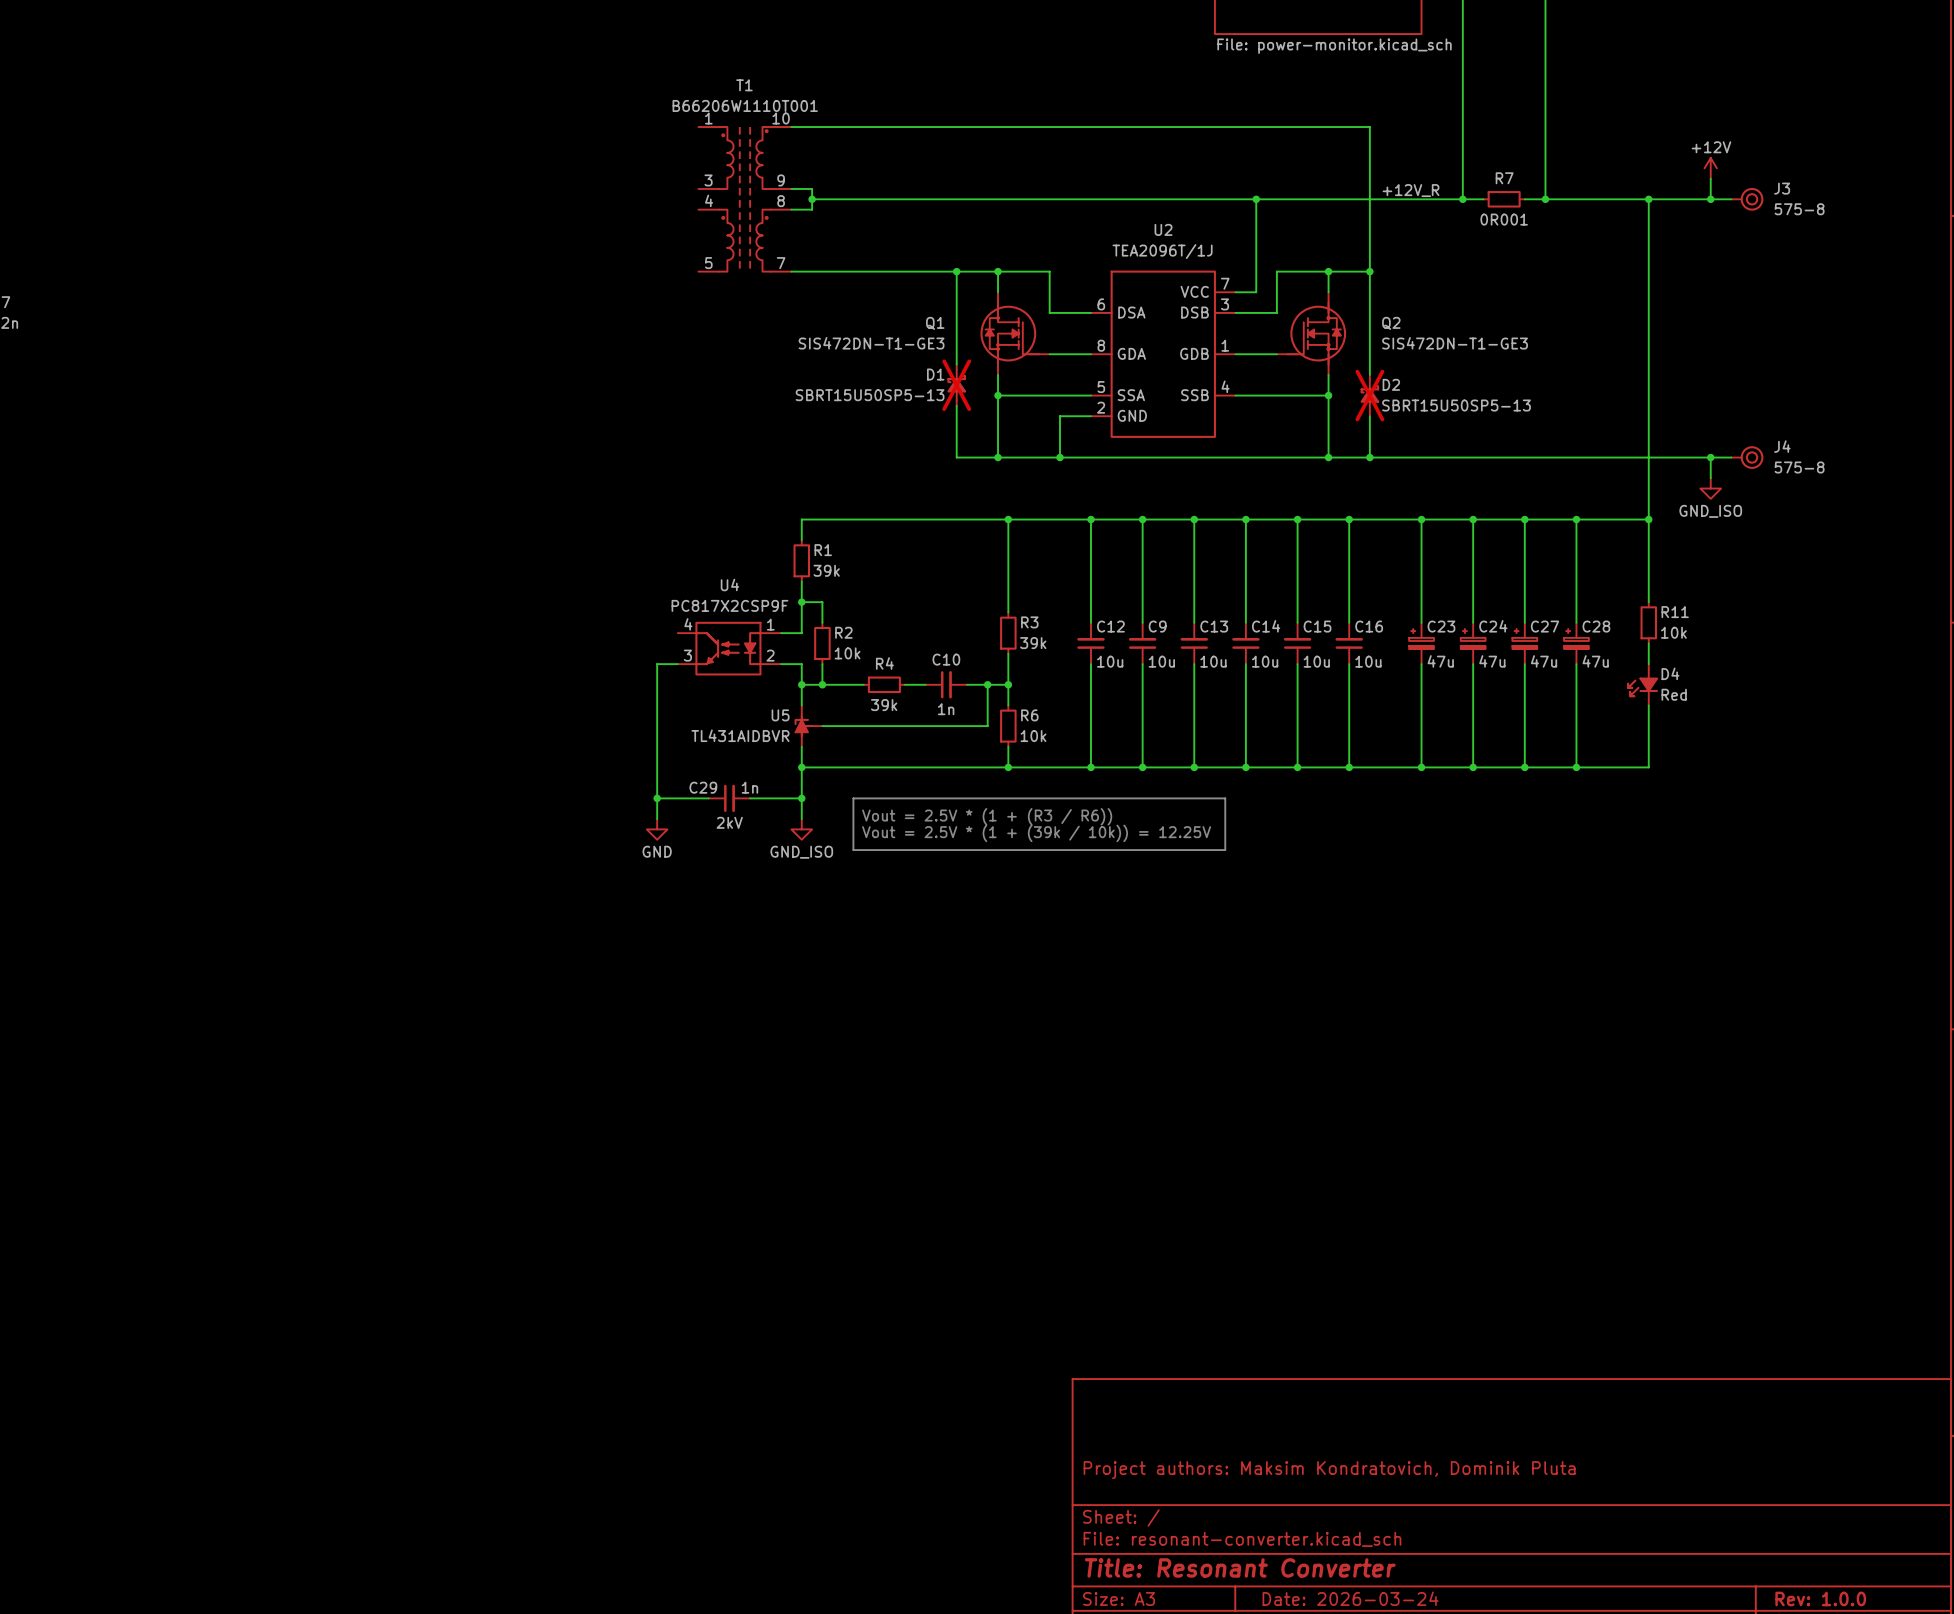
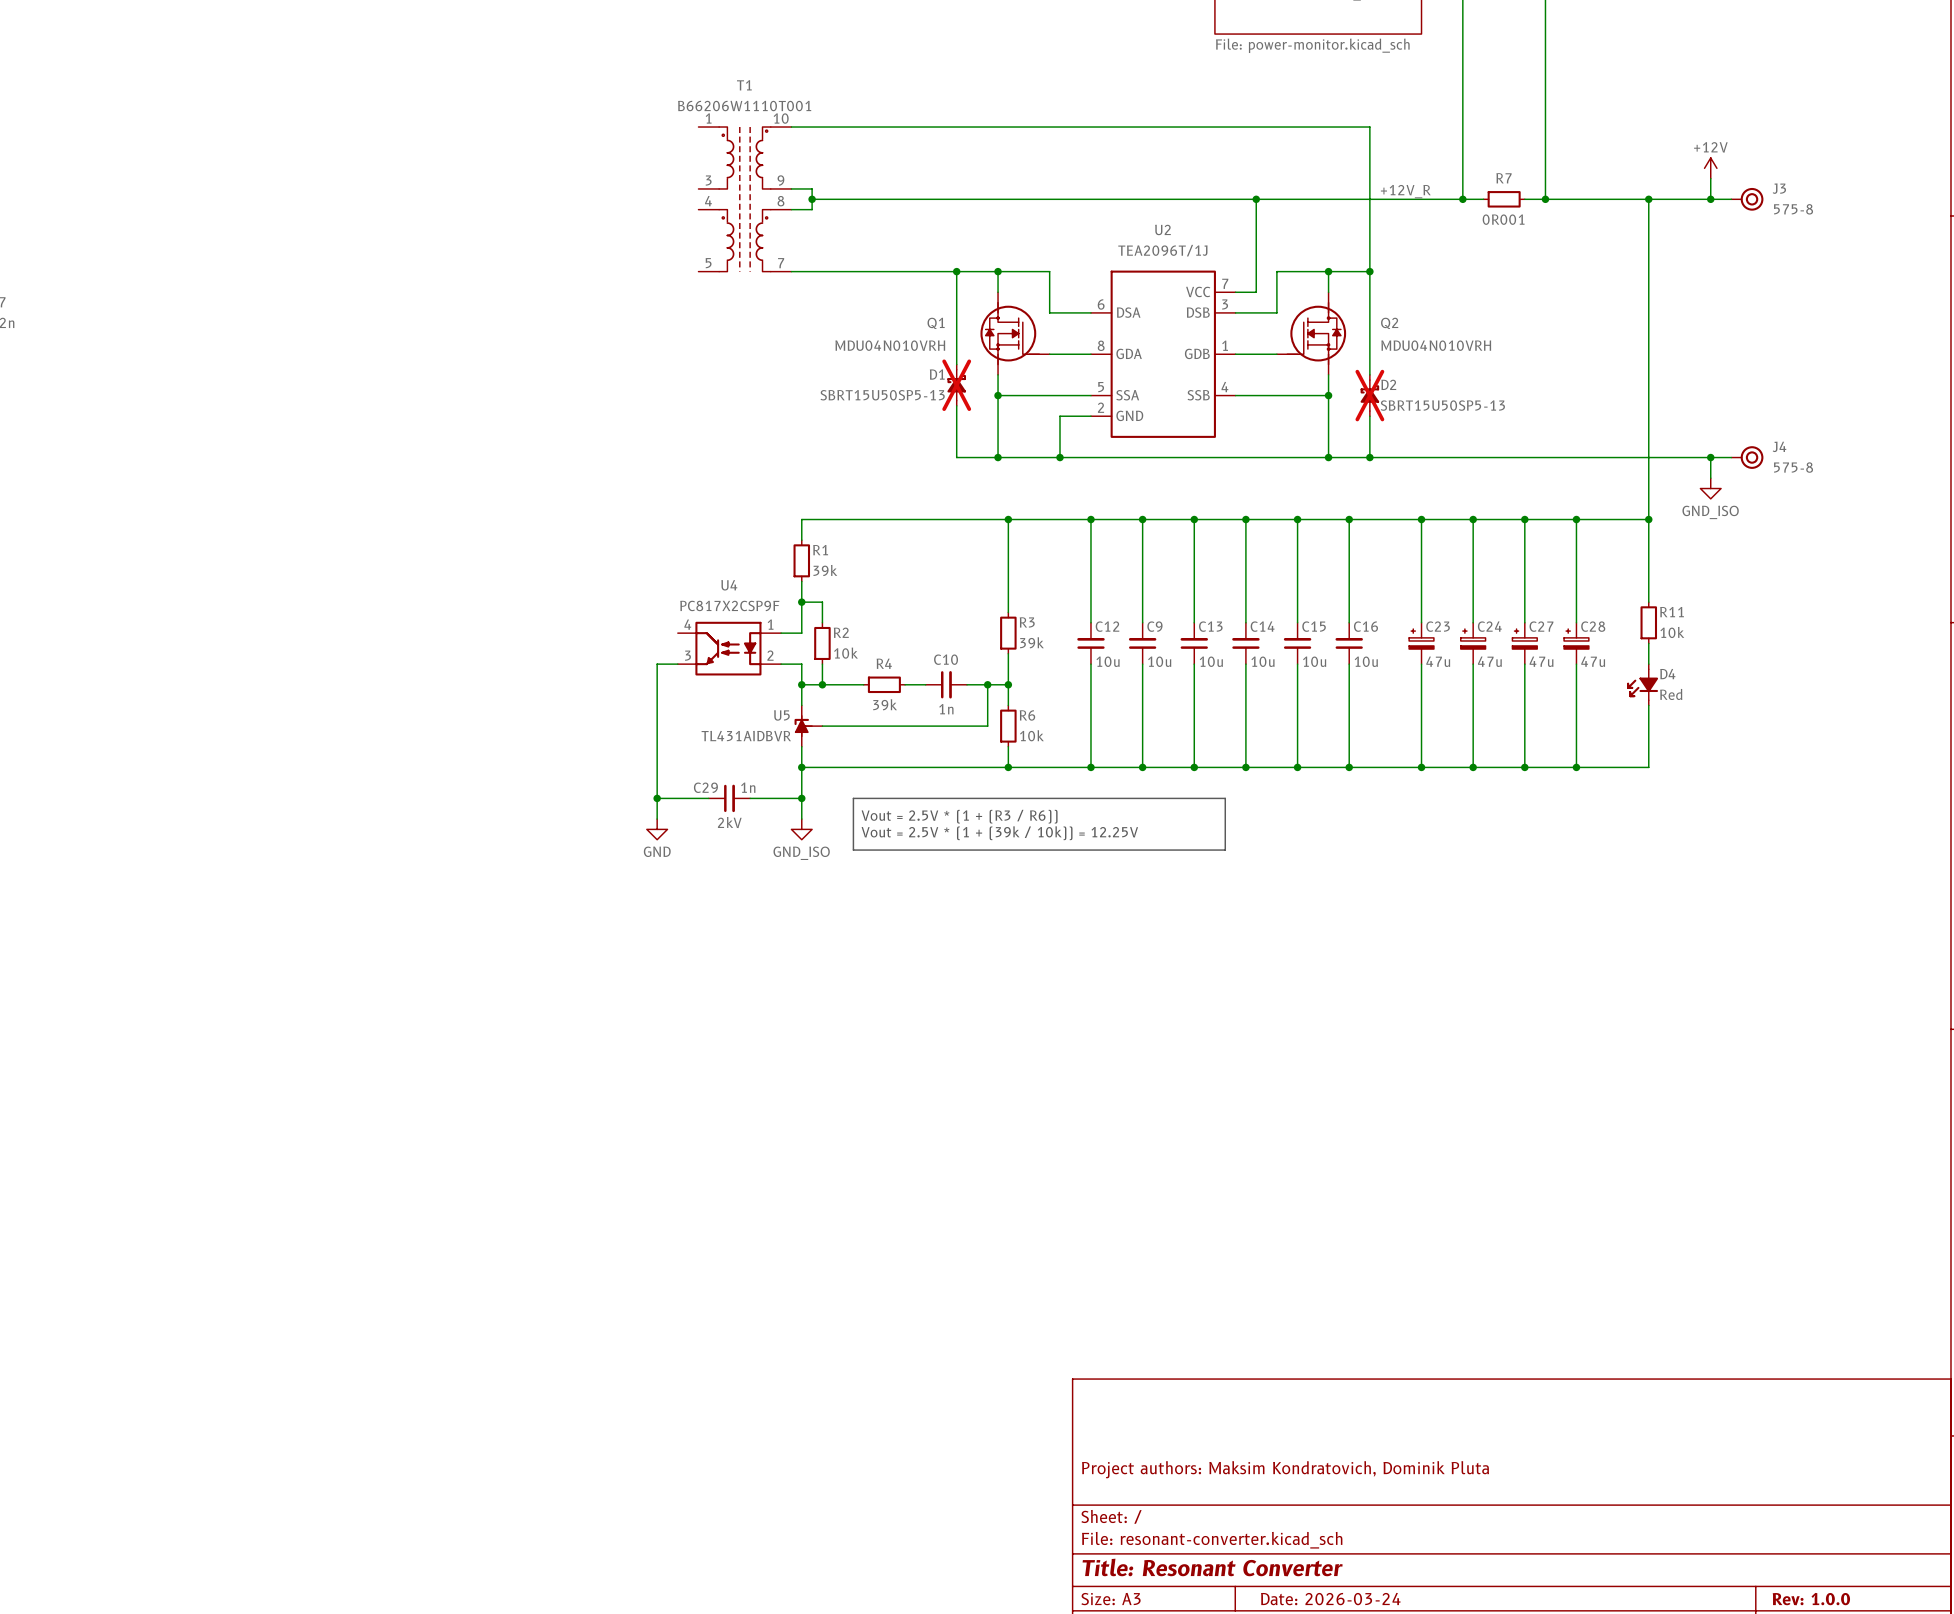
Q1 text: SIS472DN-T1-GE3 (871, 343) -> MDU04N010VRH (890, 345)
Q2 text: SIS472DN-T1-GE3 (1455, 343) -> MDU04N010VRH (1436, 345)

